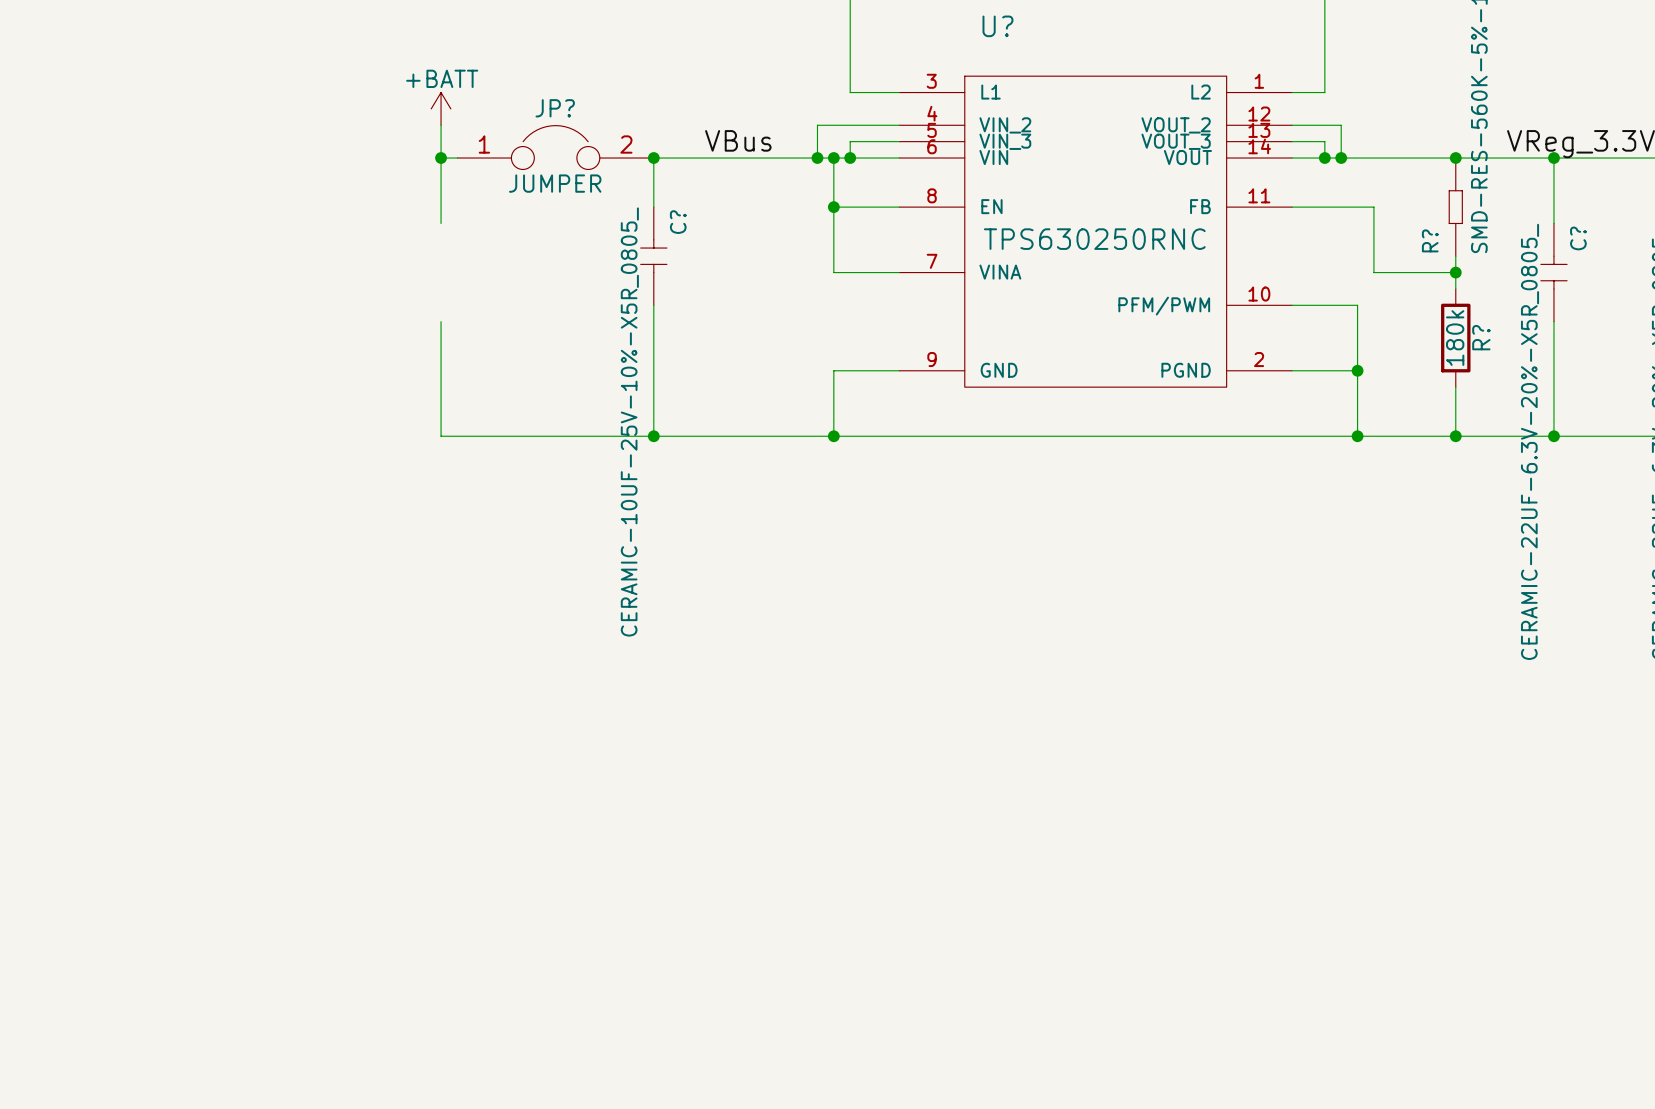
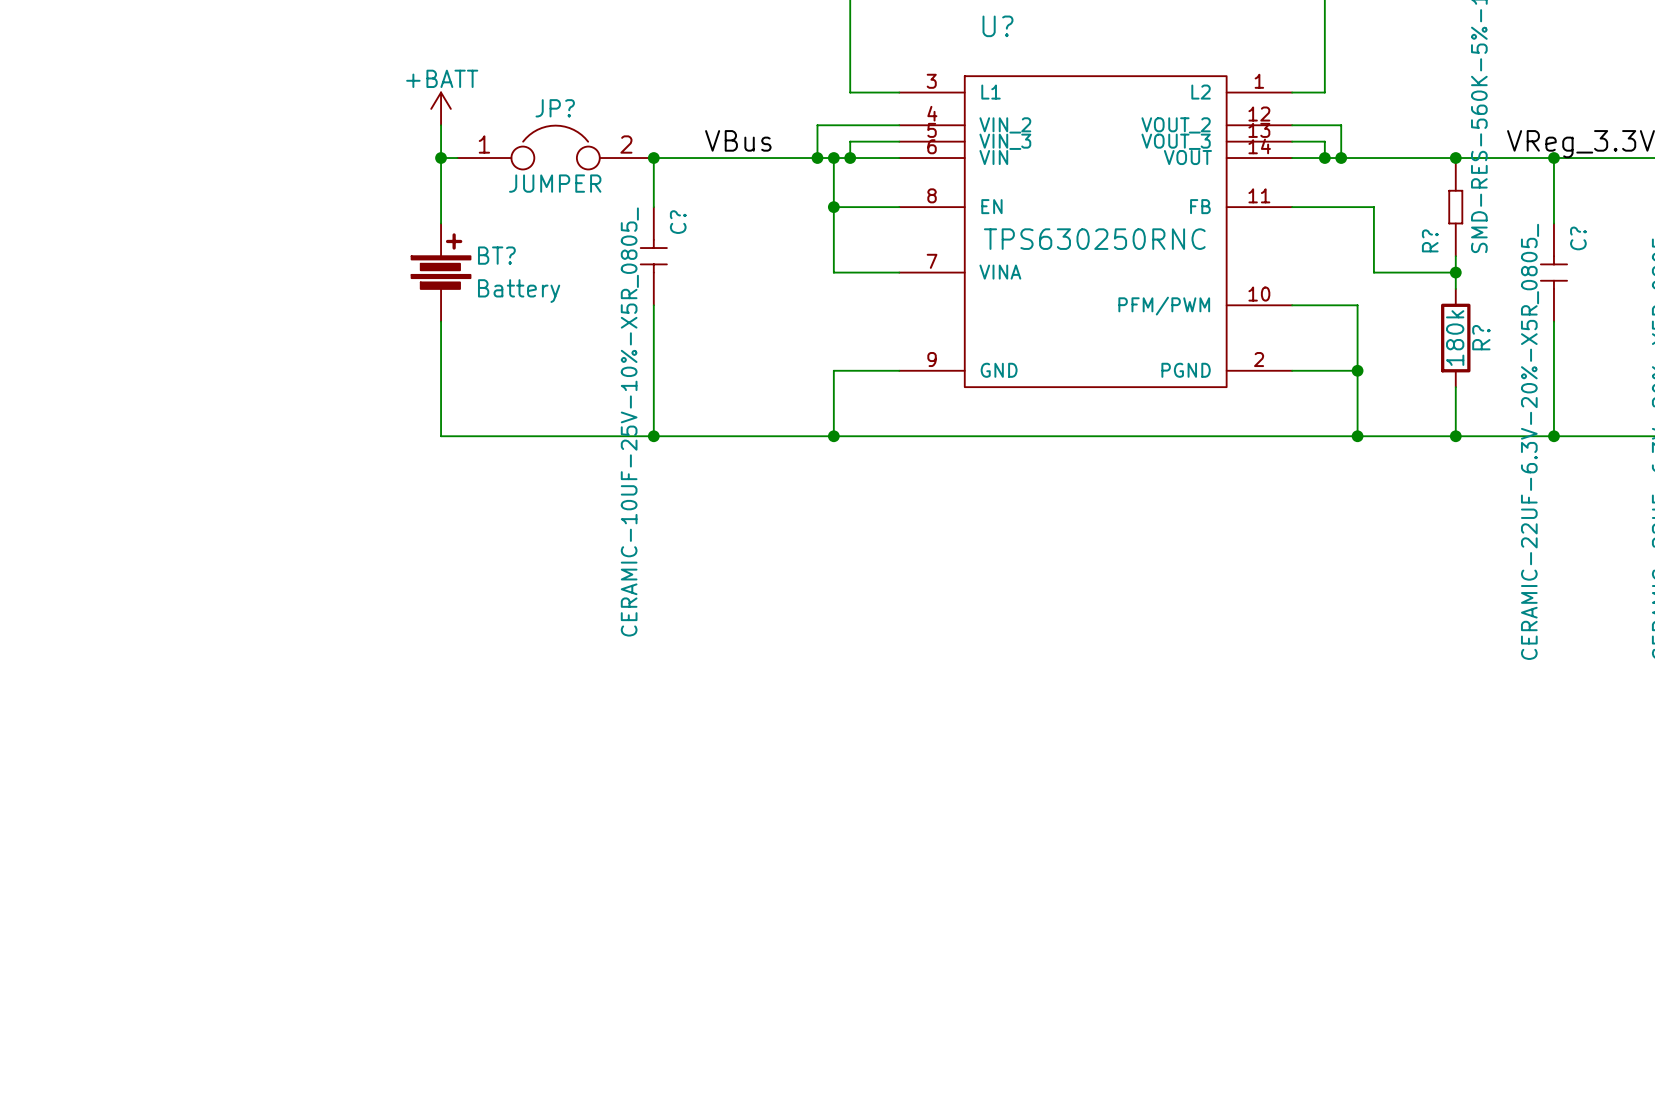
BT?: none -> Battery (441, 272)

